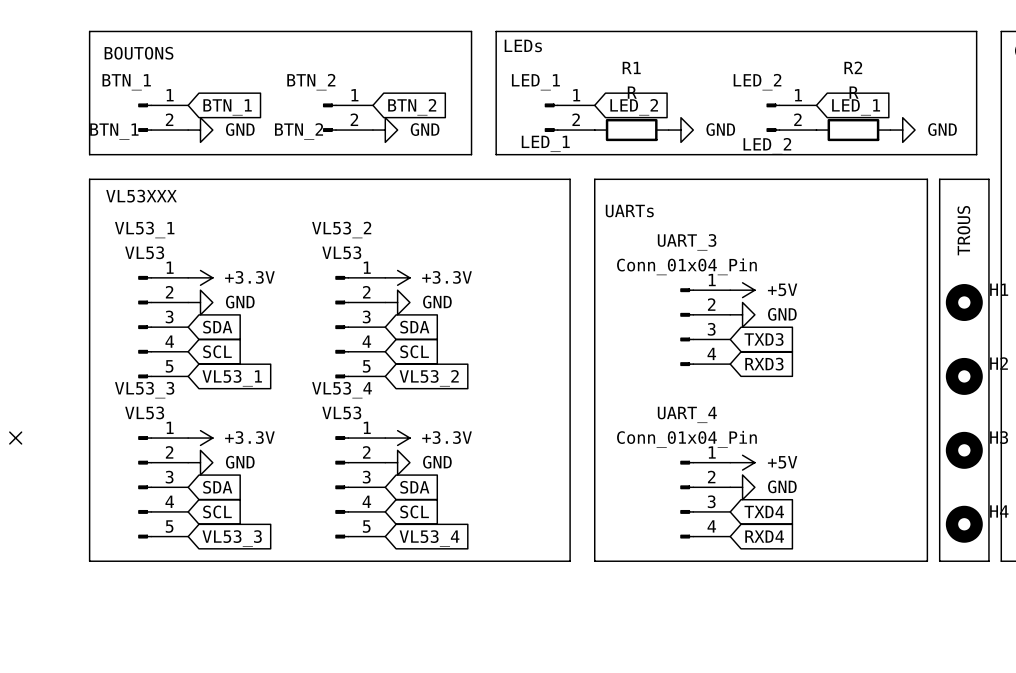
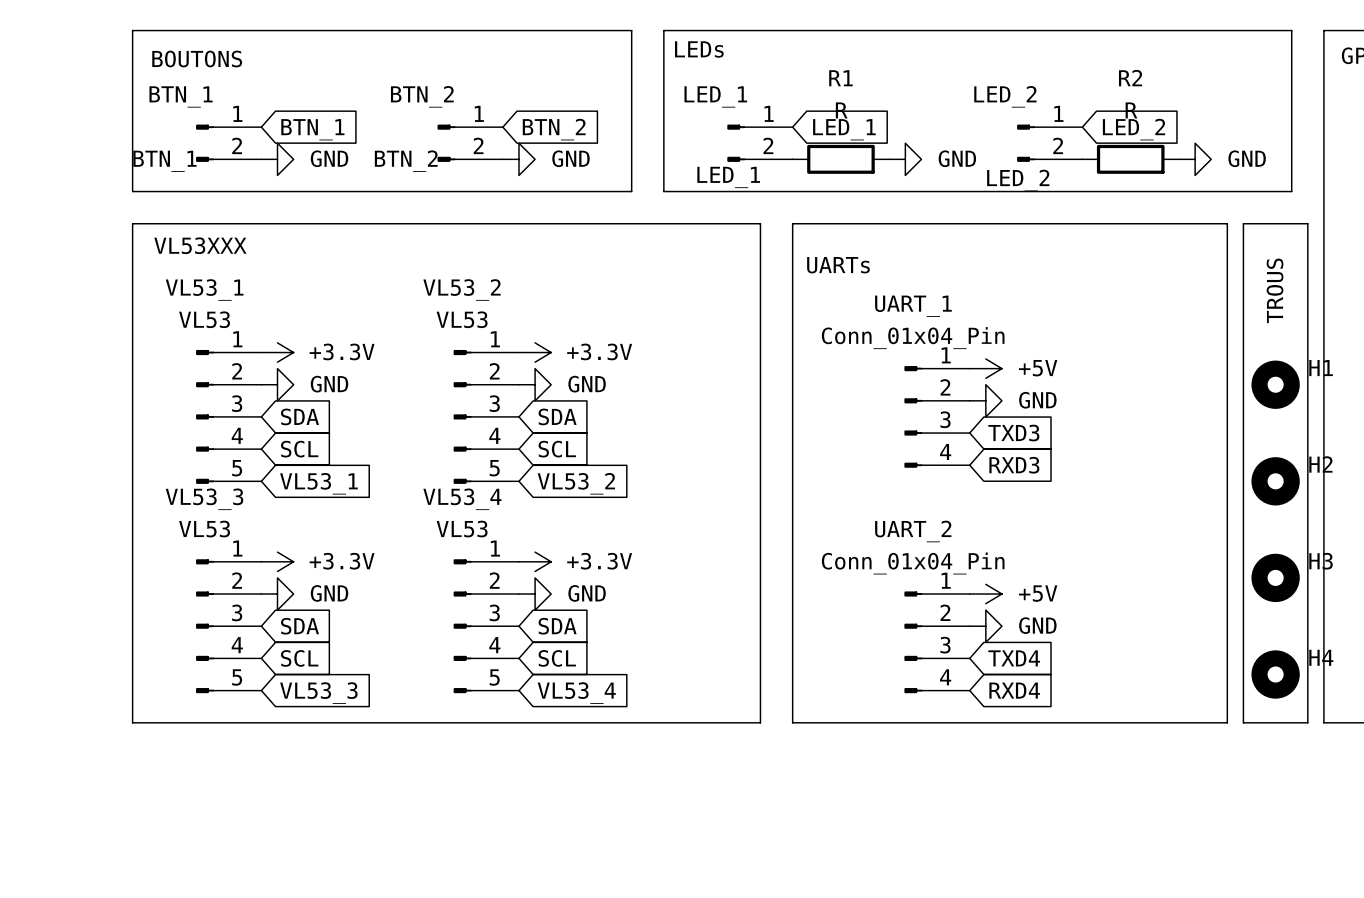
global label: LED_2 (634, 107) -> LED_1 (844, 129)
global label: LED_1 (856, 107) -> LED_2 (1134, 129)
UART_3 name: UART_3 (687, 242) -> UART_1 (913, 306)
UART_4 name: UART_4 (687, 414) -> UART_2 (913, 531)
no-connect mark: (15, 438) -> none

